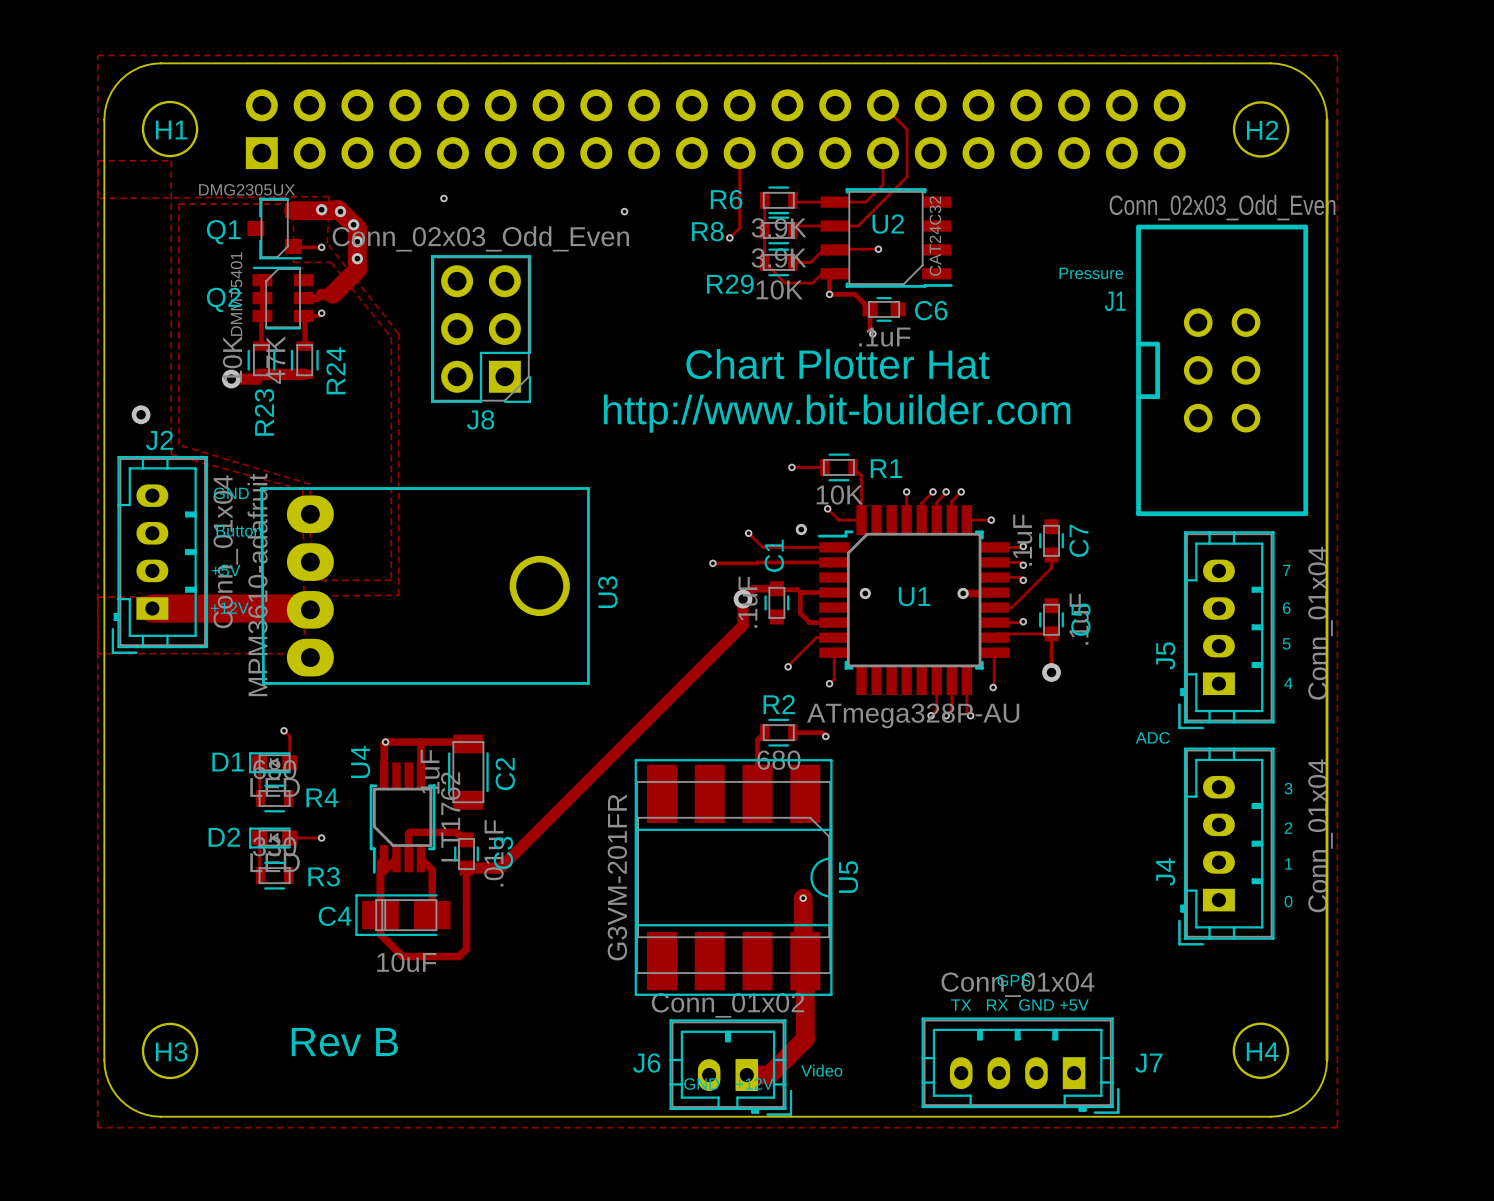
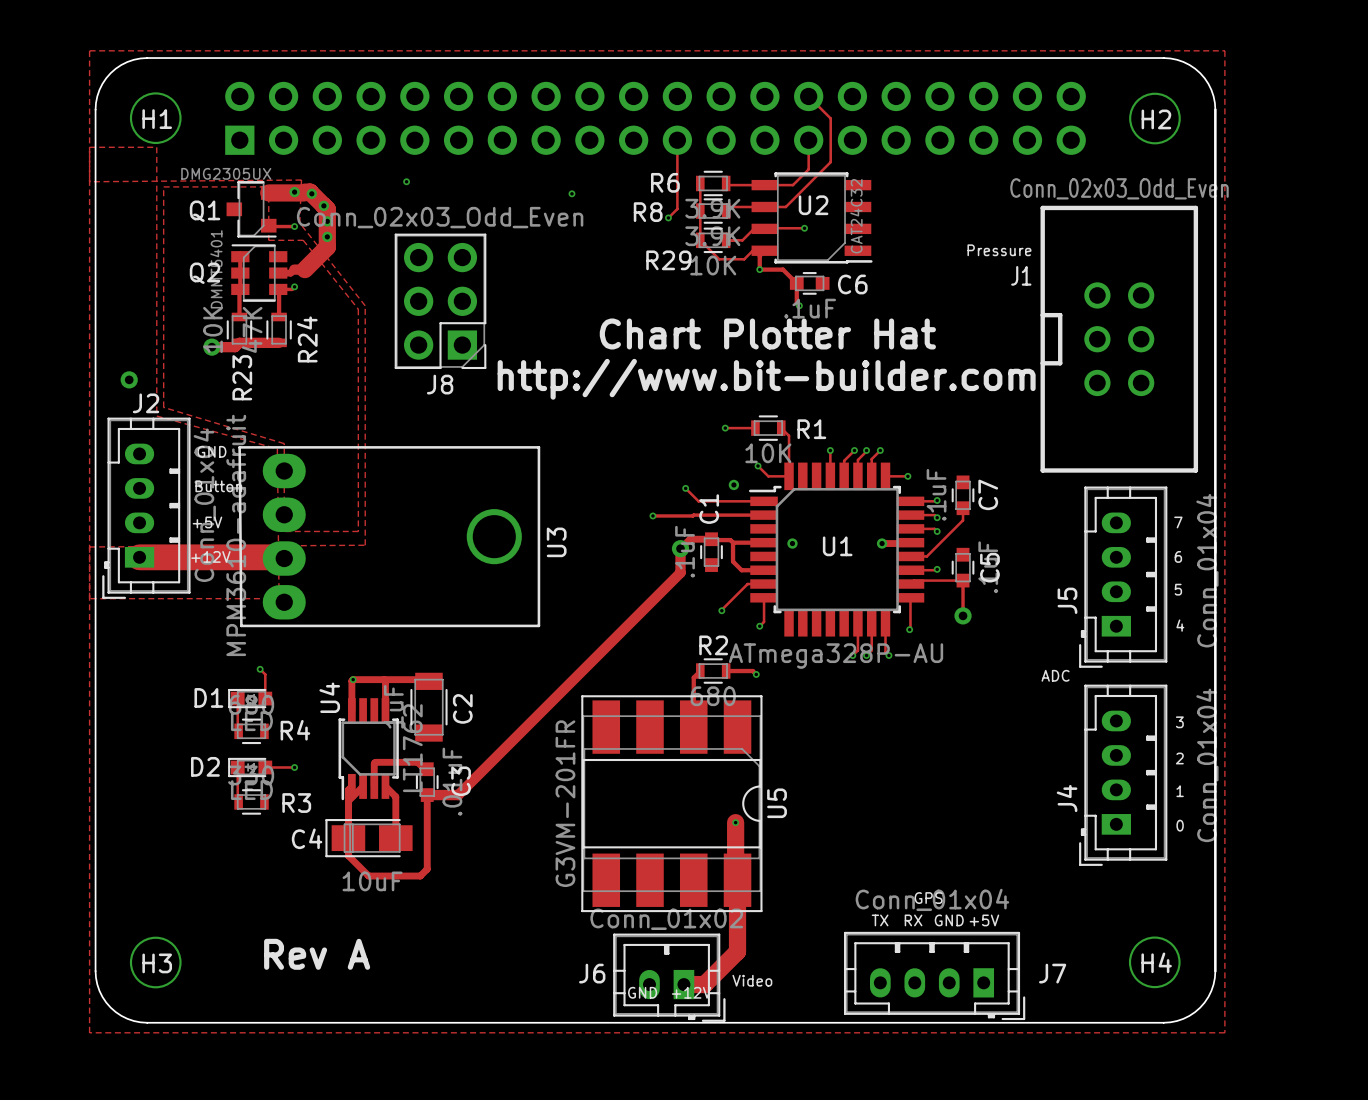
text: Rev B (344, 1042) -> Rev A (317, 954)

